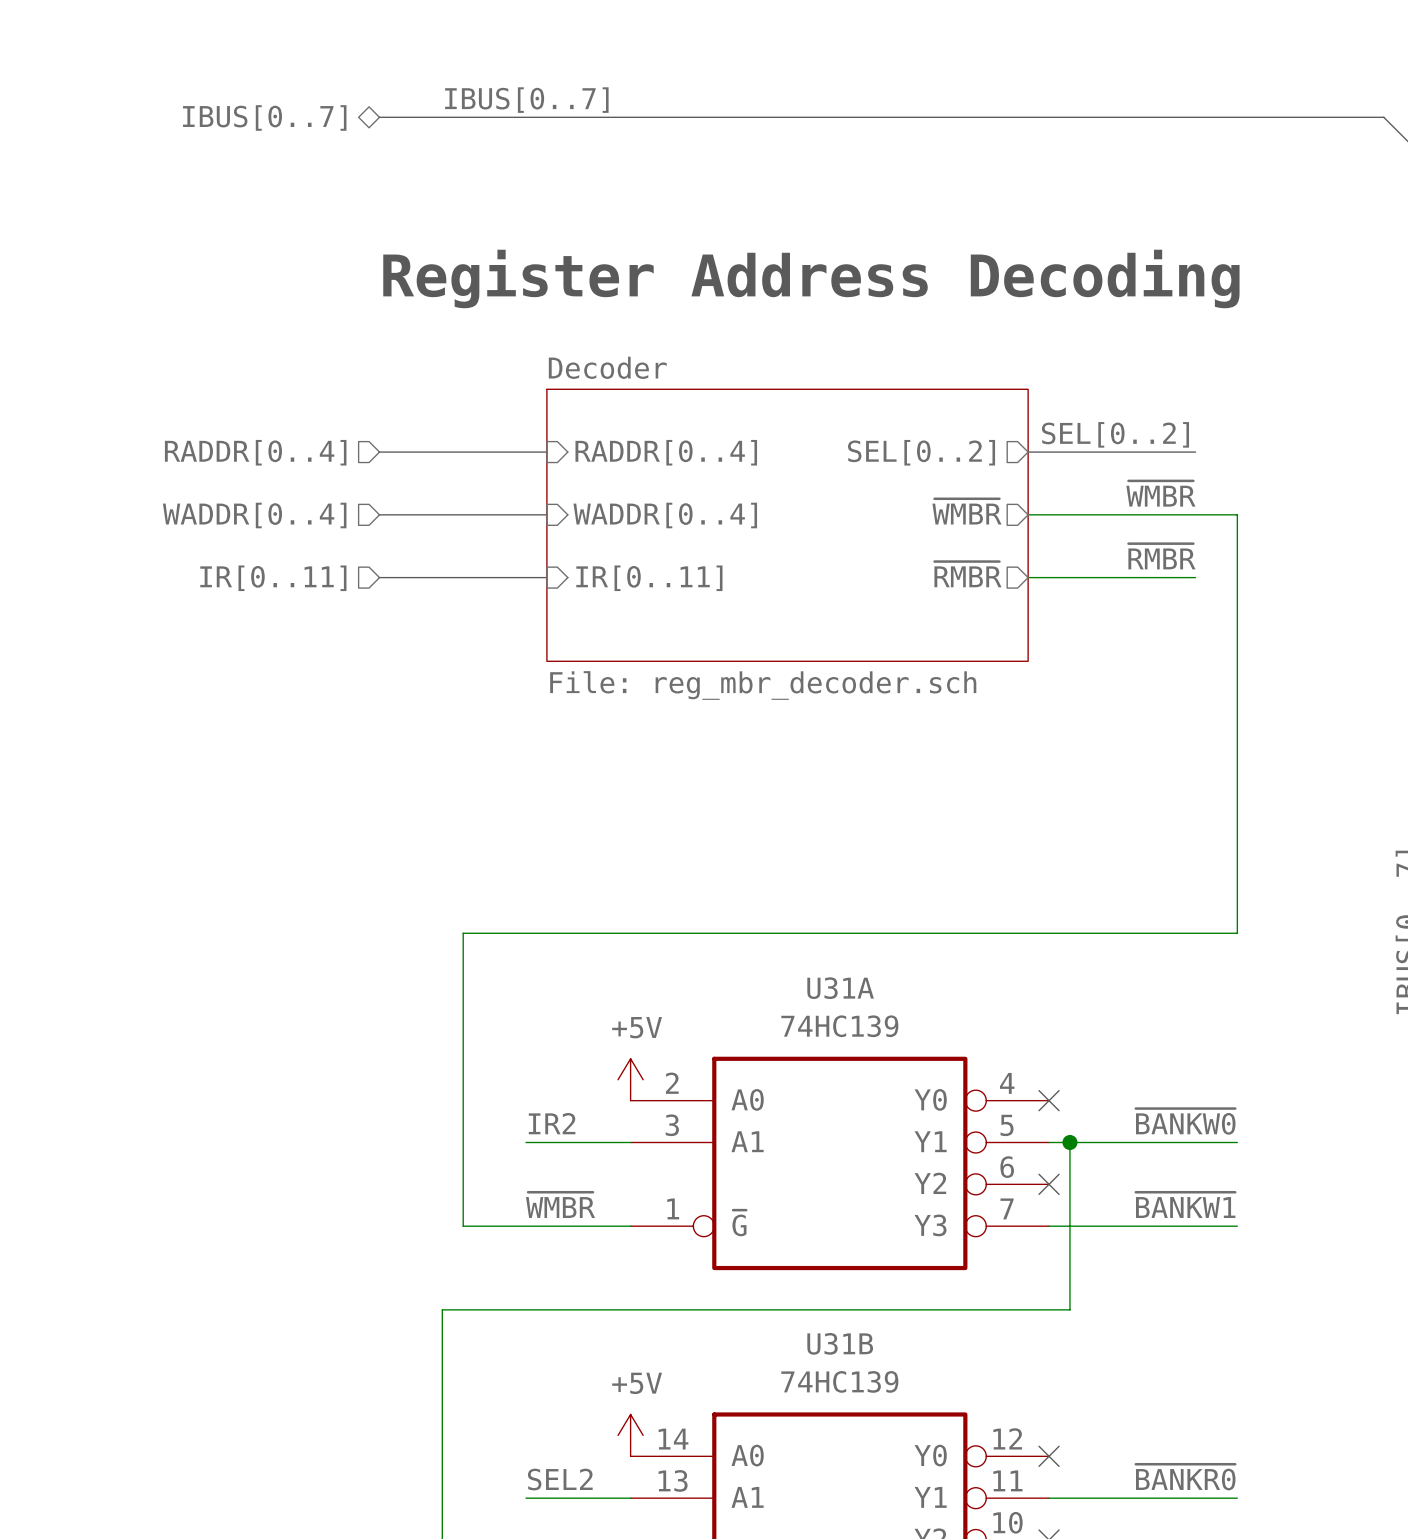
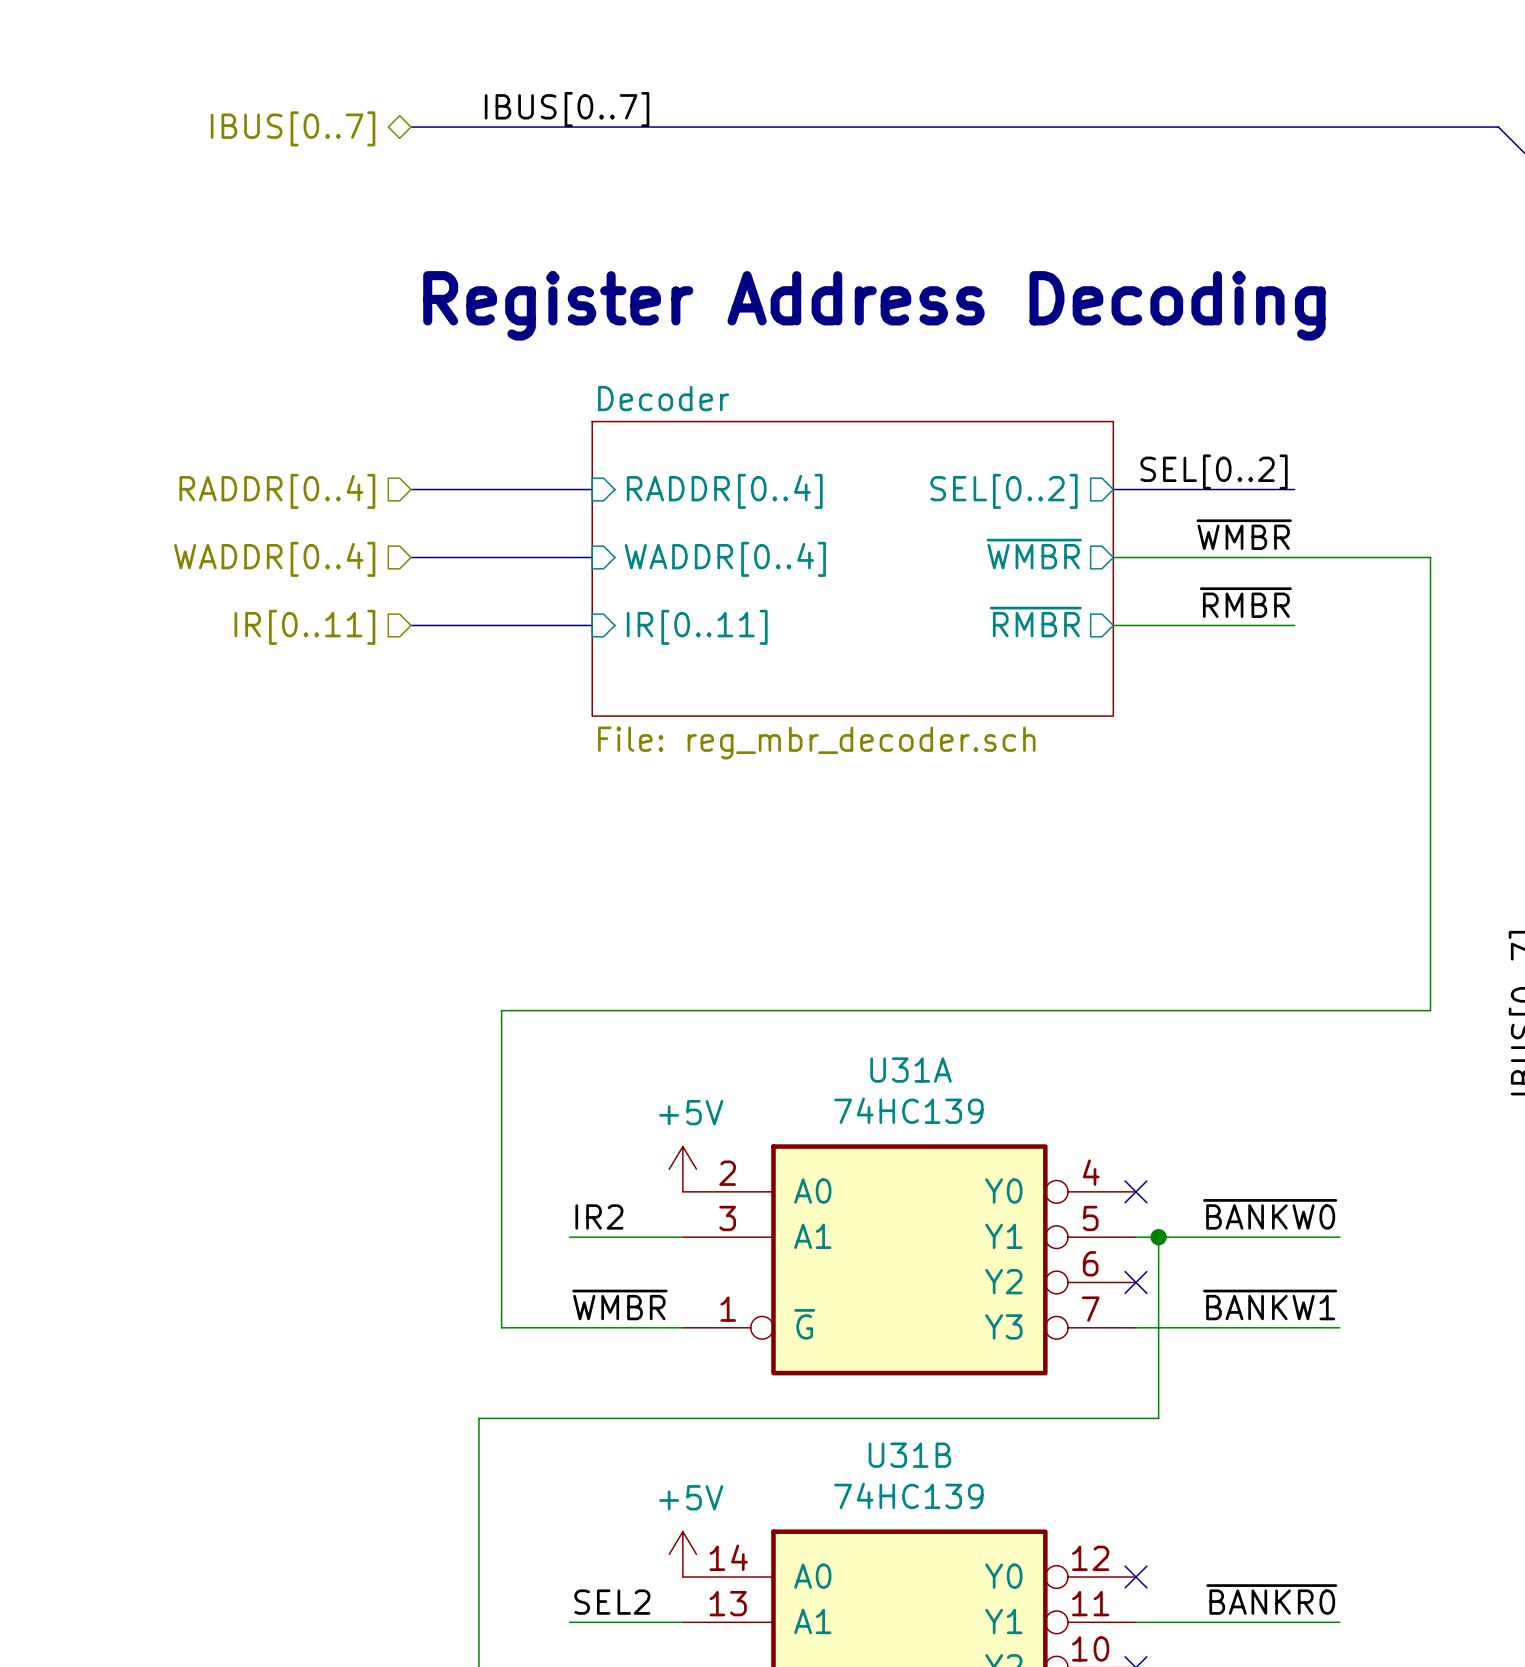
wire: (1237, 514) (1237, 933) -> (1339, 557) (1430, 557) (1430, 1010) (1339, 1010)

